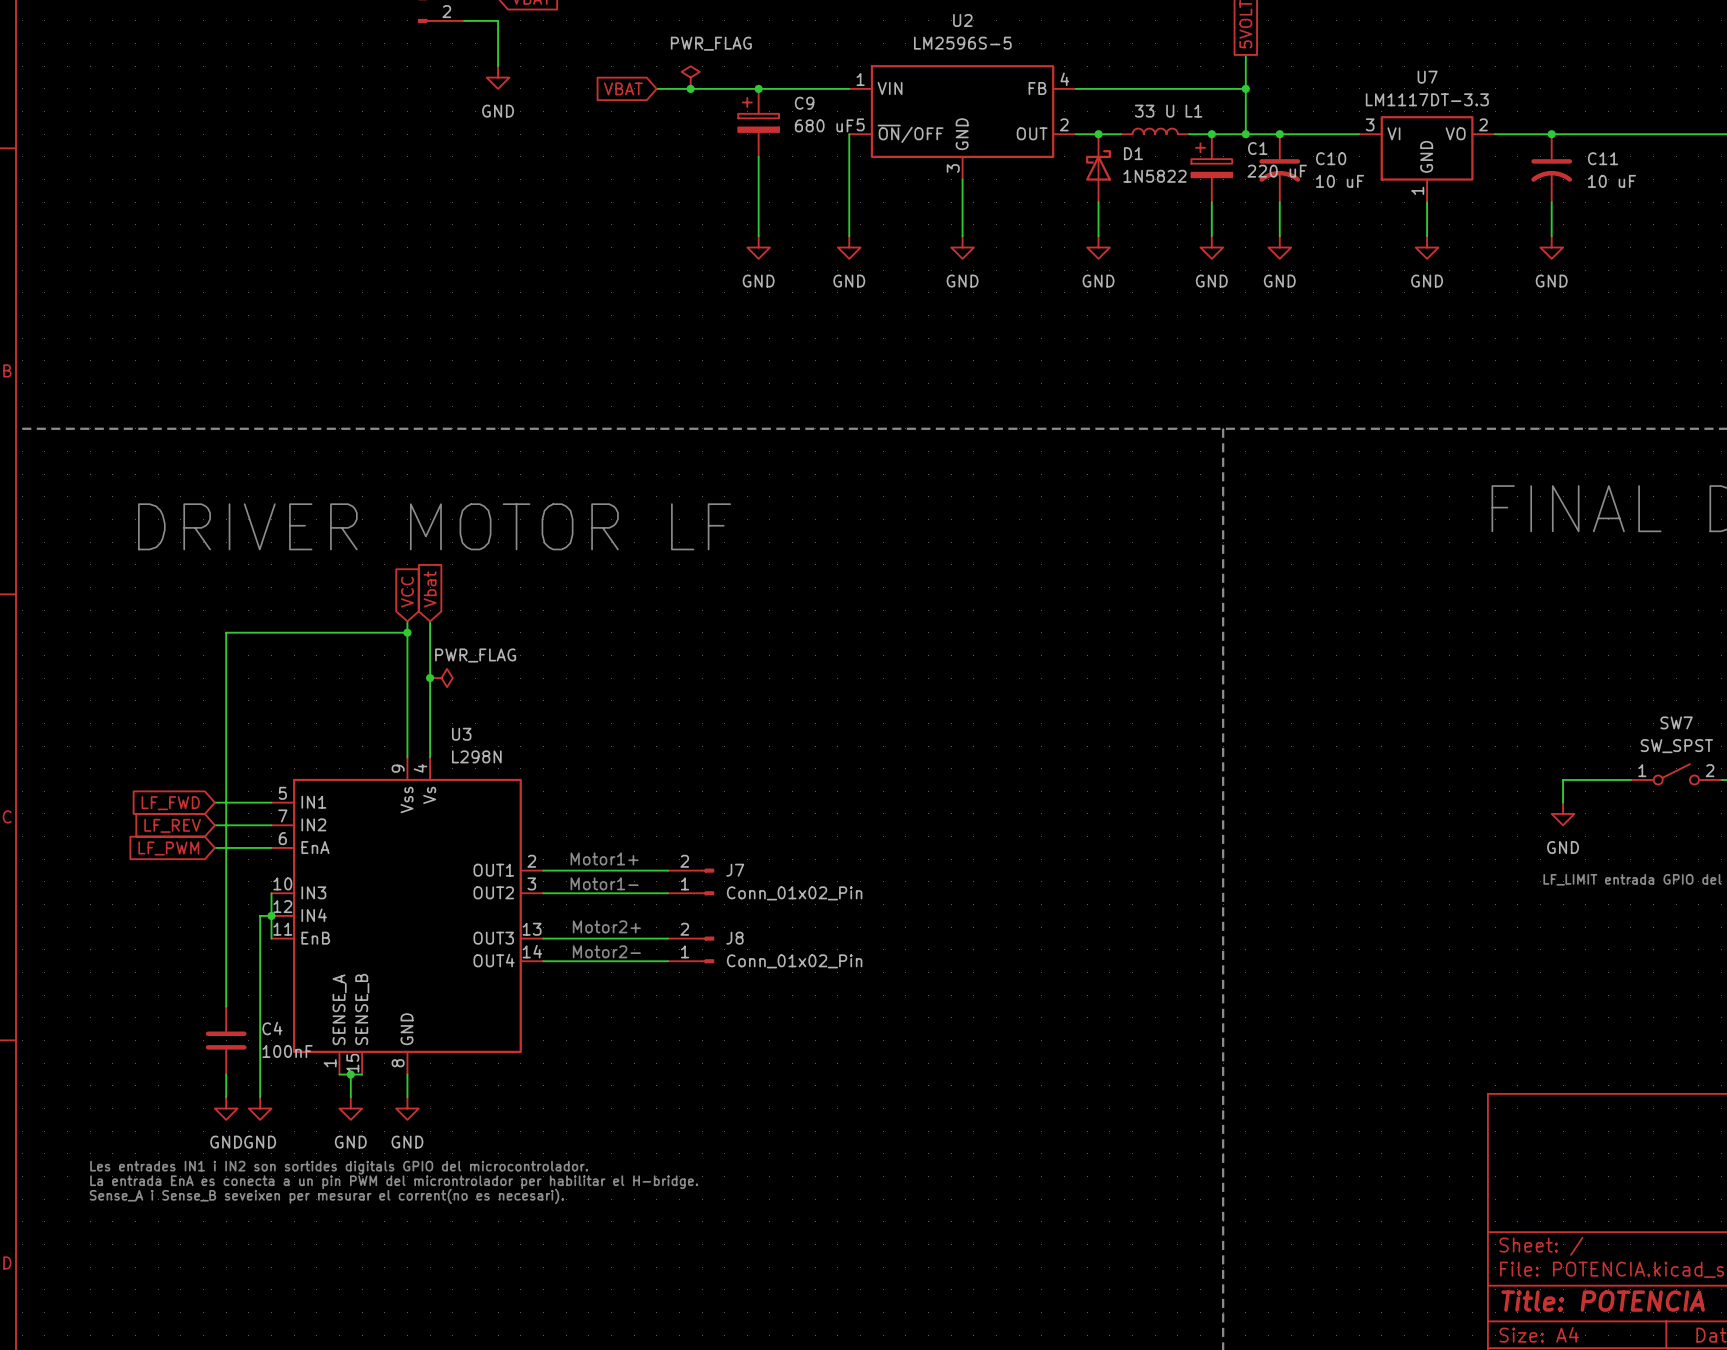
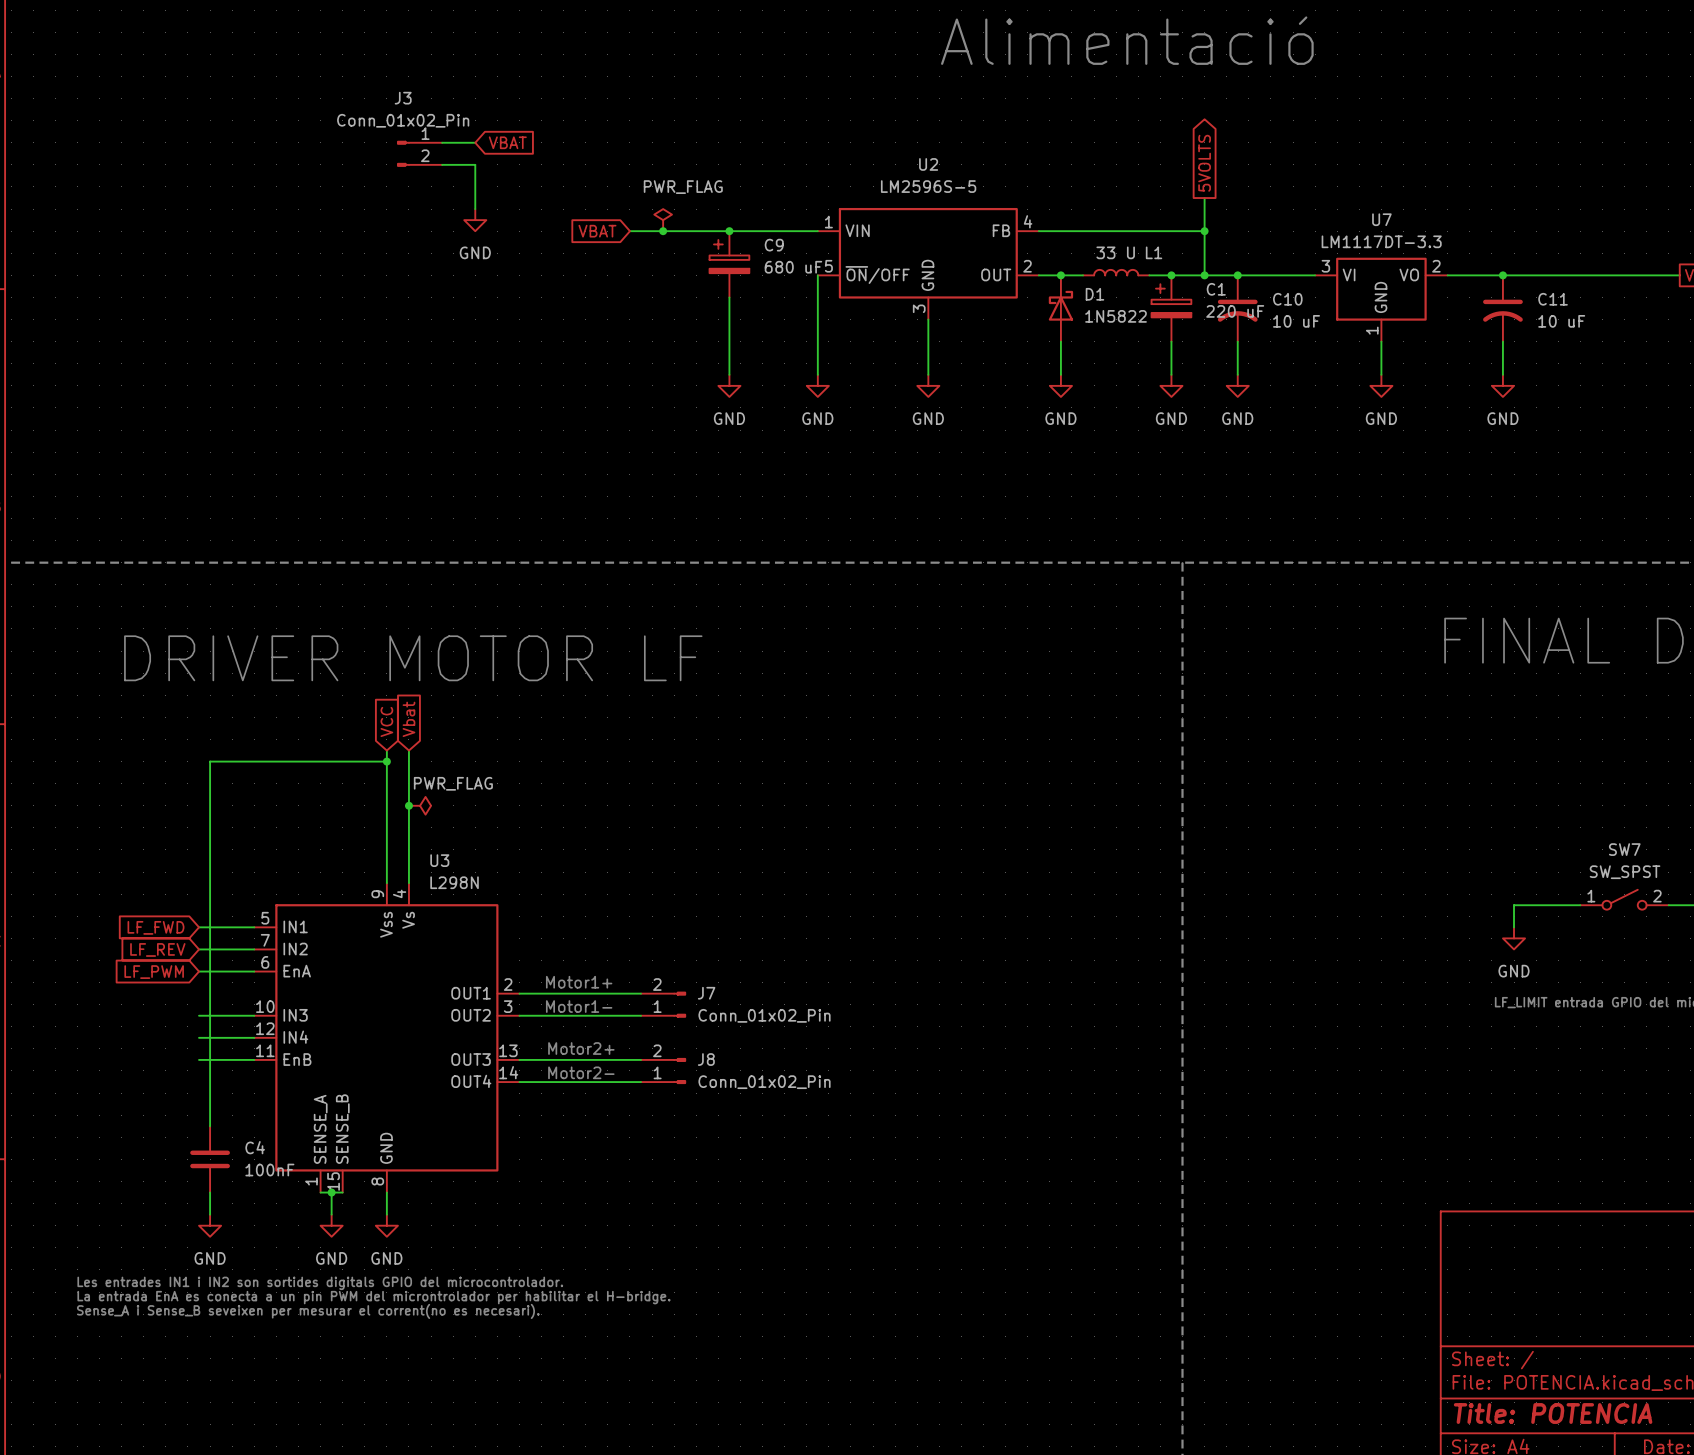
wire: (271, 893) (271, 938) -> (254, 1015) (199, 1015)
wire: (260, 915) (260, 1097) -> (243, 1037) (199, 1037)
junction: (271, 915) -> none
wire: none -> (199, 1059) (254, 1059)
power symbol: GND (260, 1108) -> none

